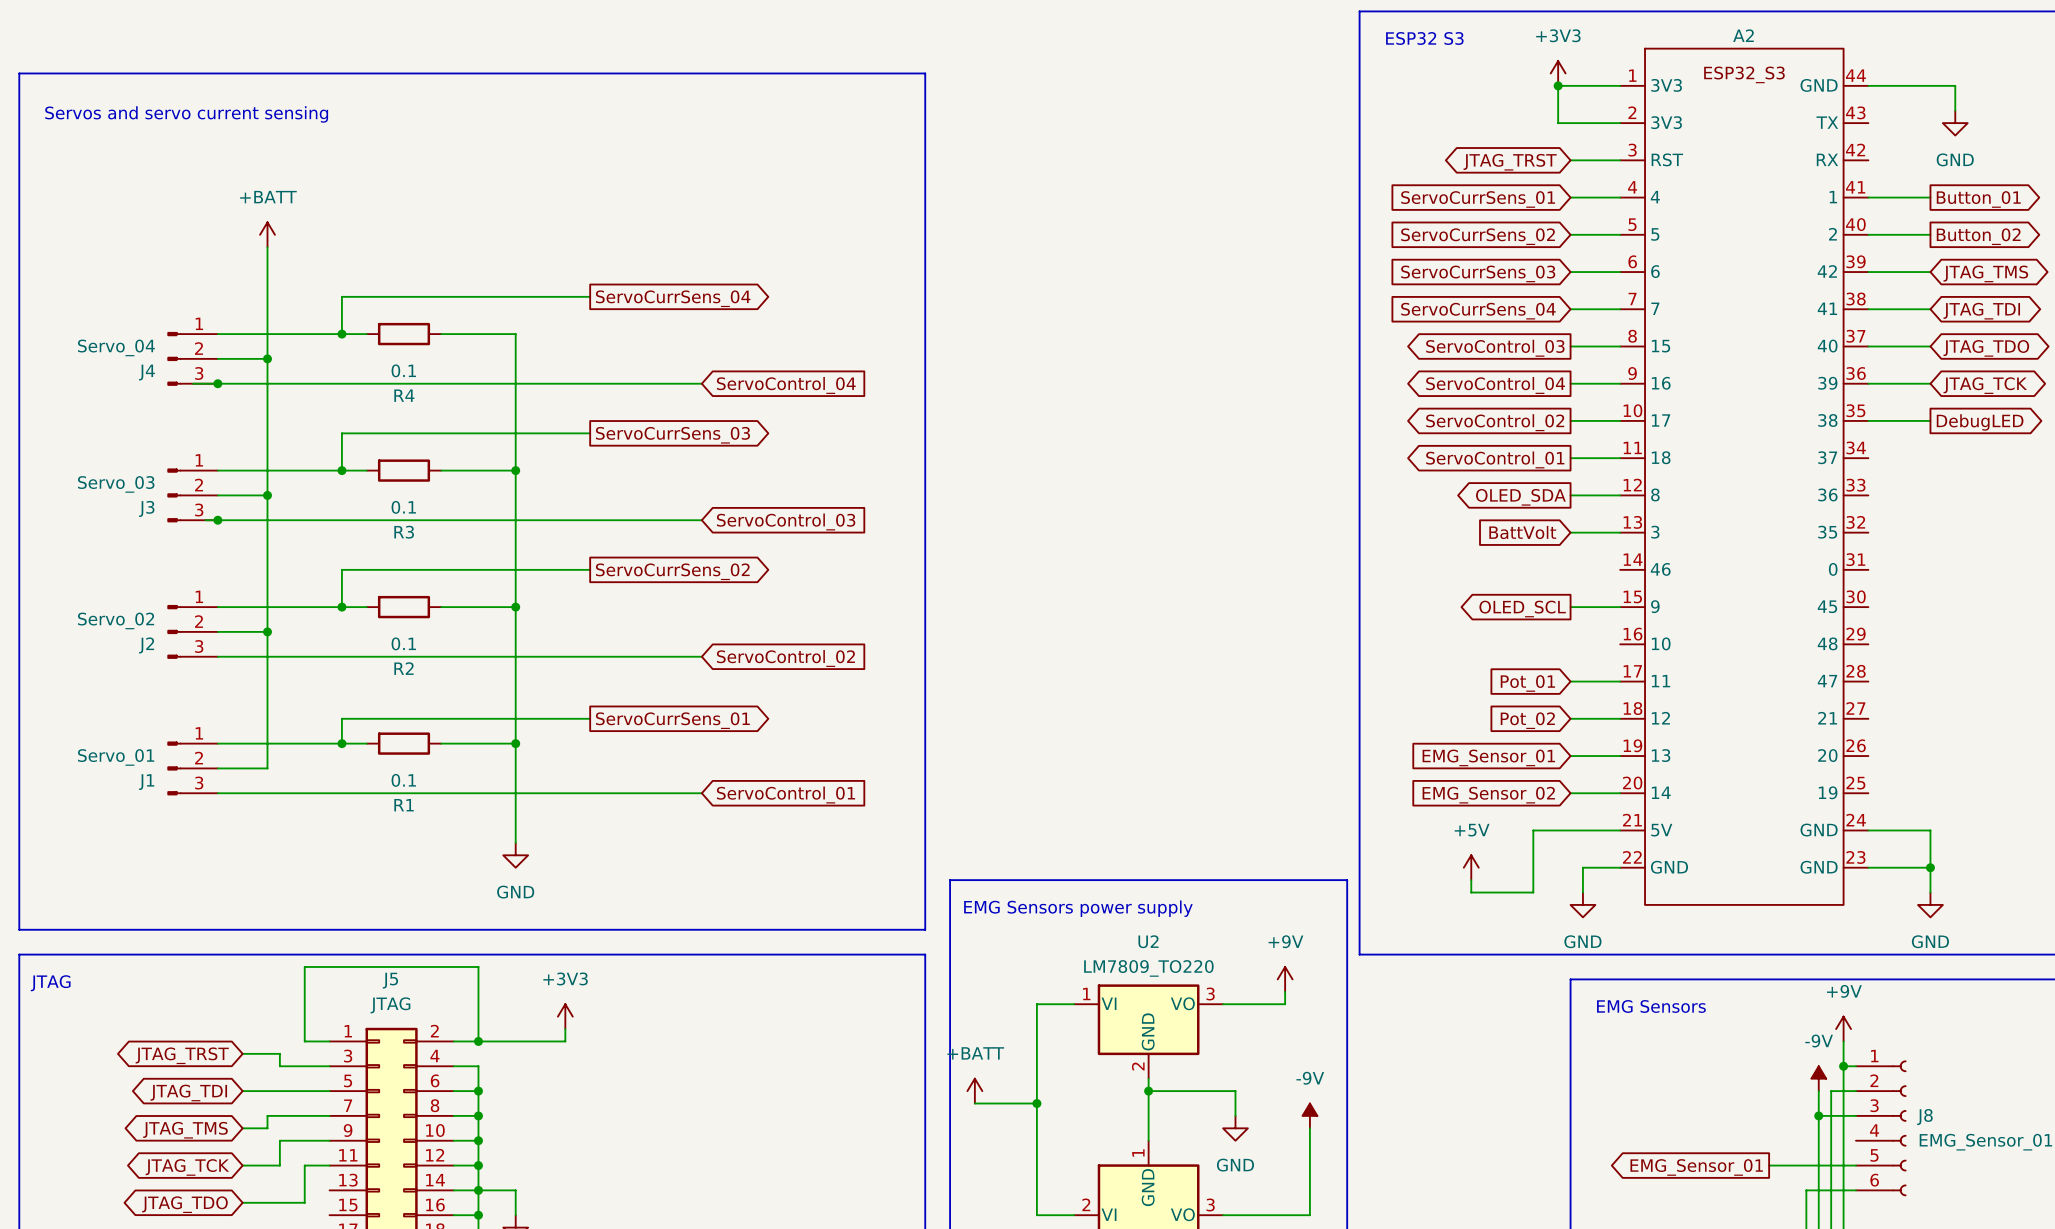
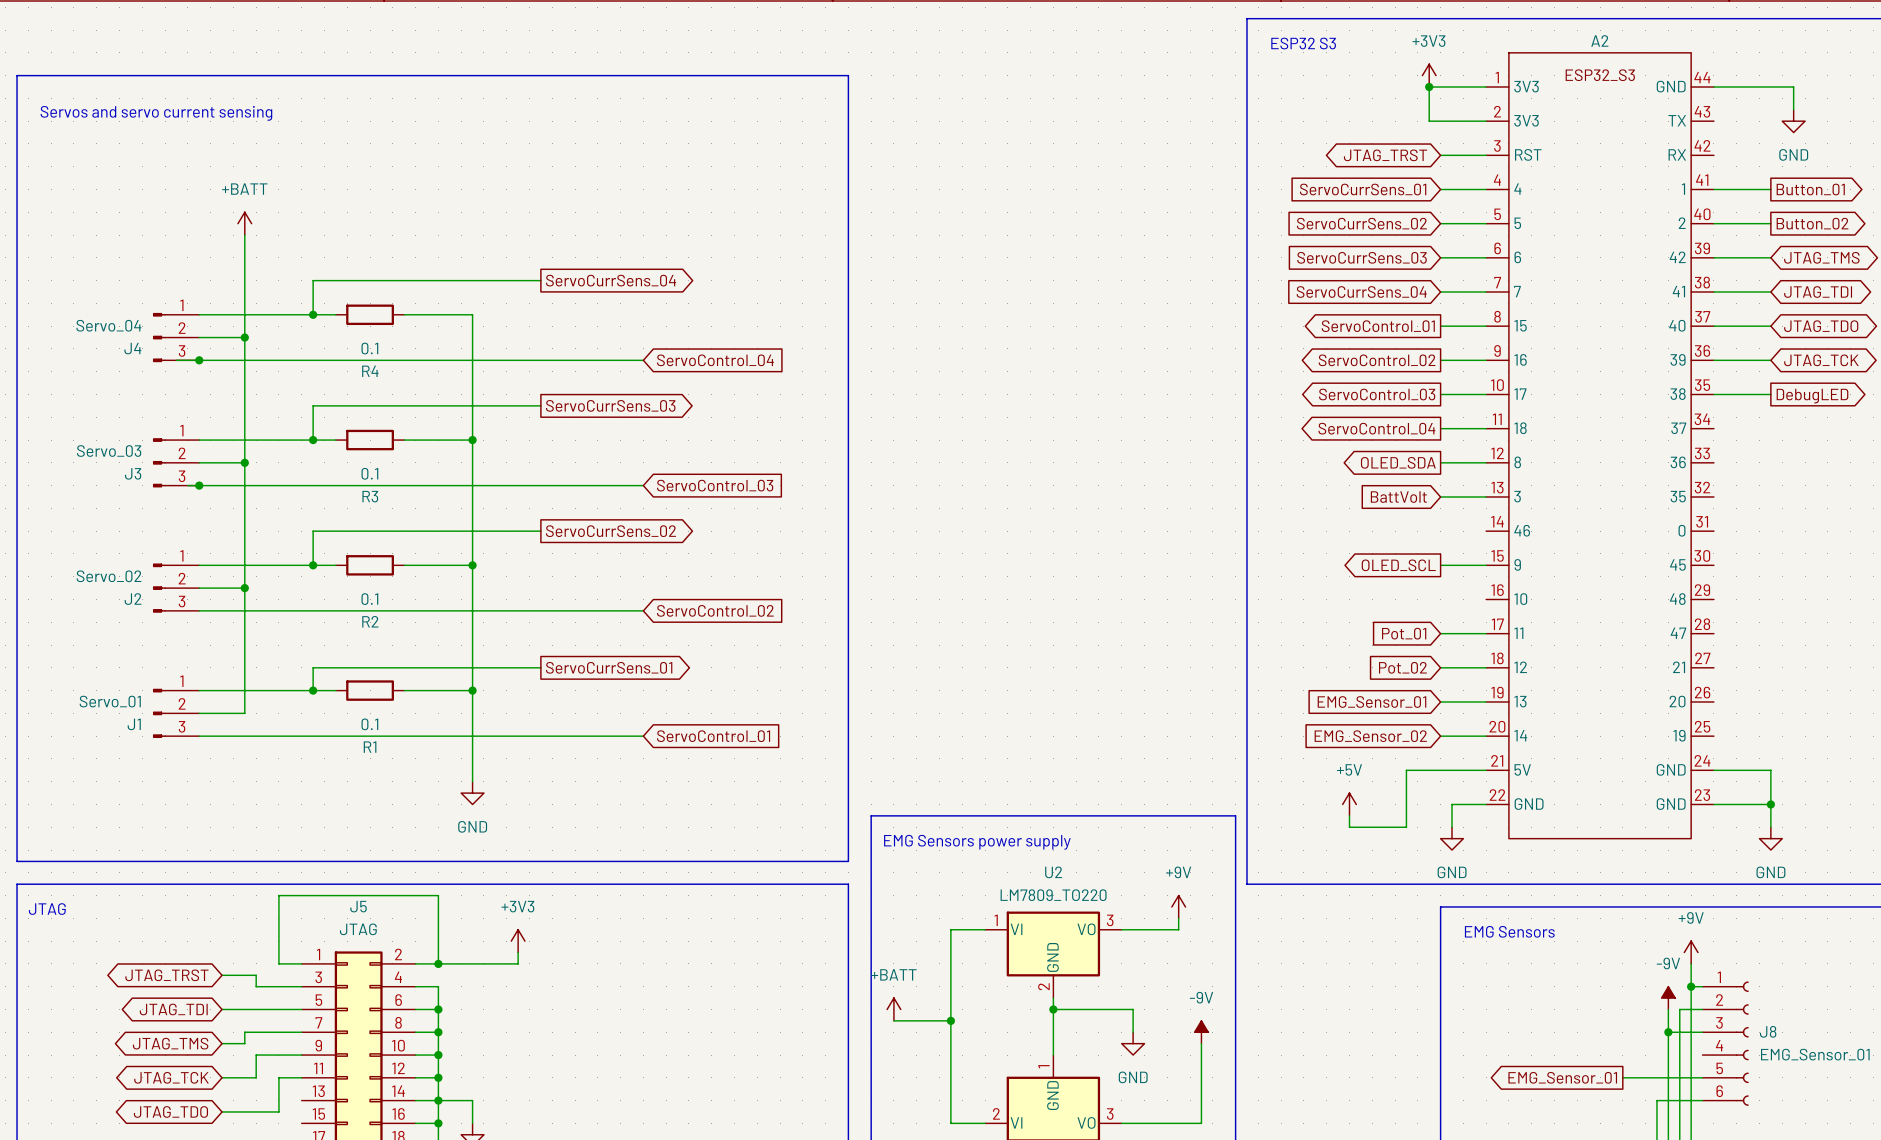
global label: ServoControl_03 (1495, 348) -> ServoControl_01 (1378, 326)
global label: ServoControl_04 (1495, 385) -> ServoControl_02 (1377, 360)
global label: ServoControl_02 (1495, 422) -> ServoControl_03 (1377, 394)
global label: ServoControl_01 (1495, 459) -> ServoControl_04 (1376, 428)

